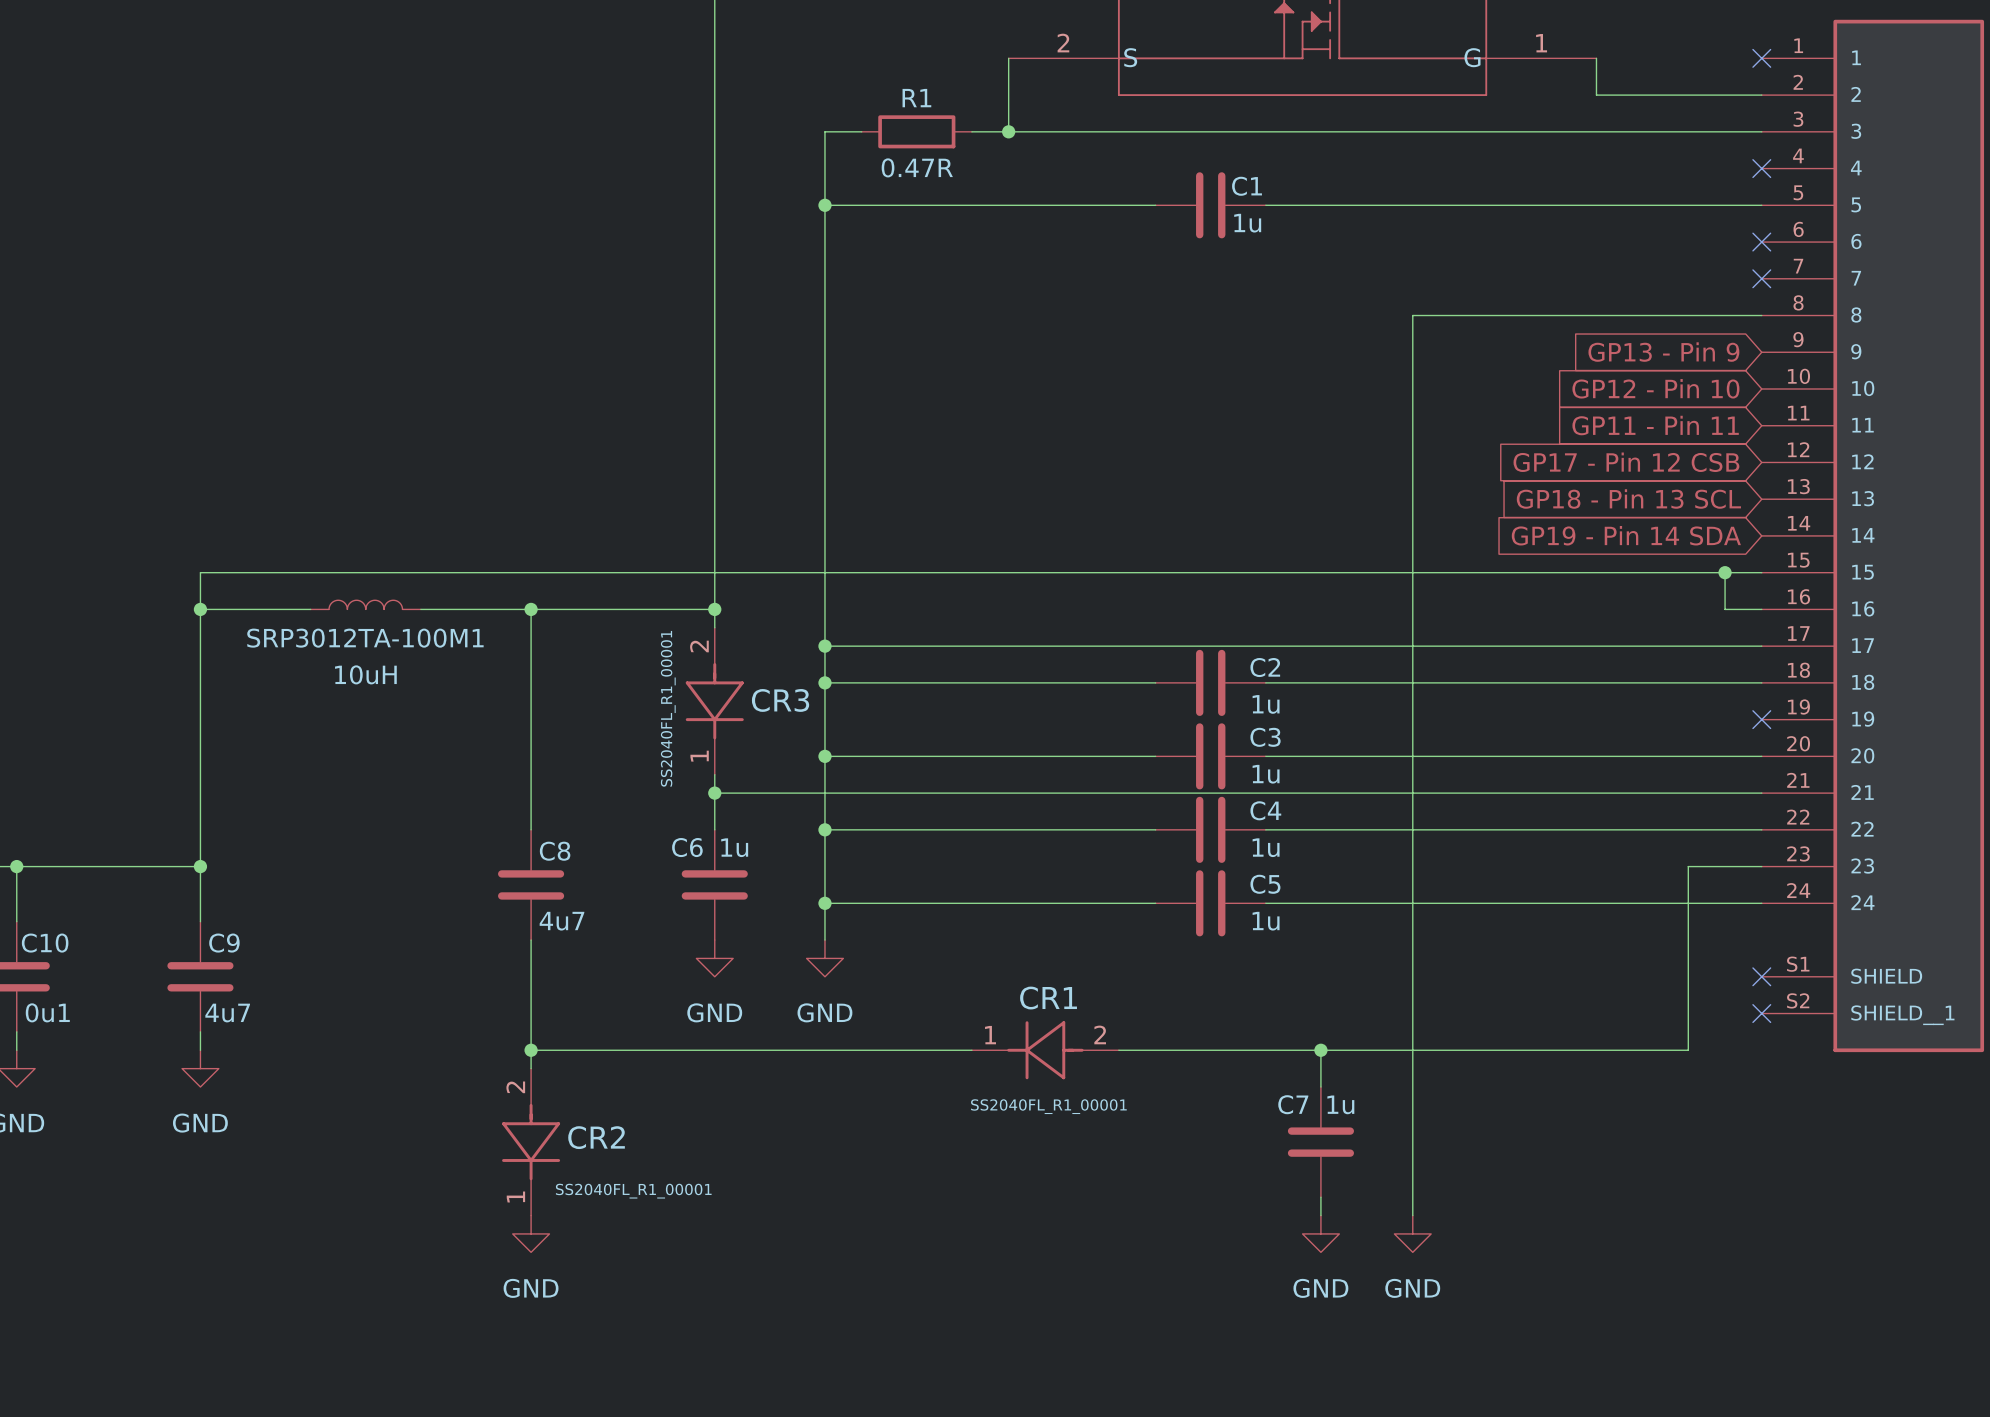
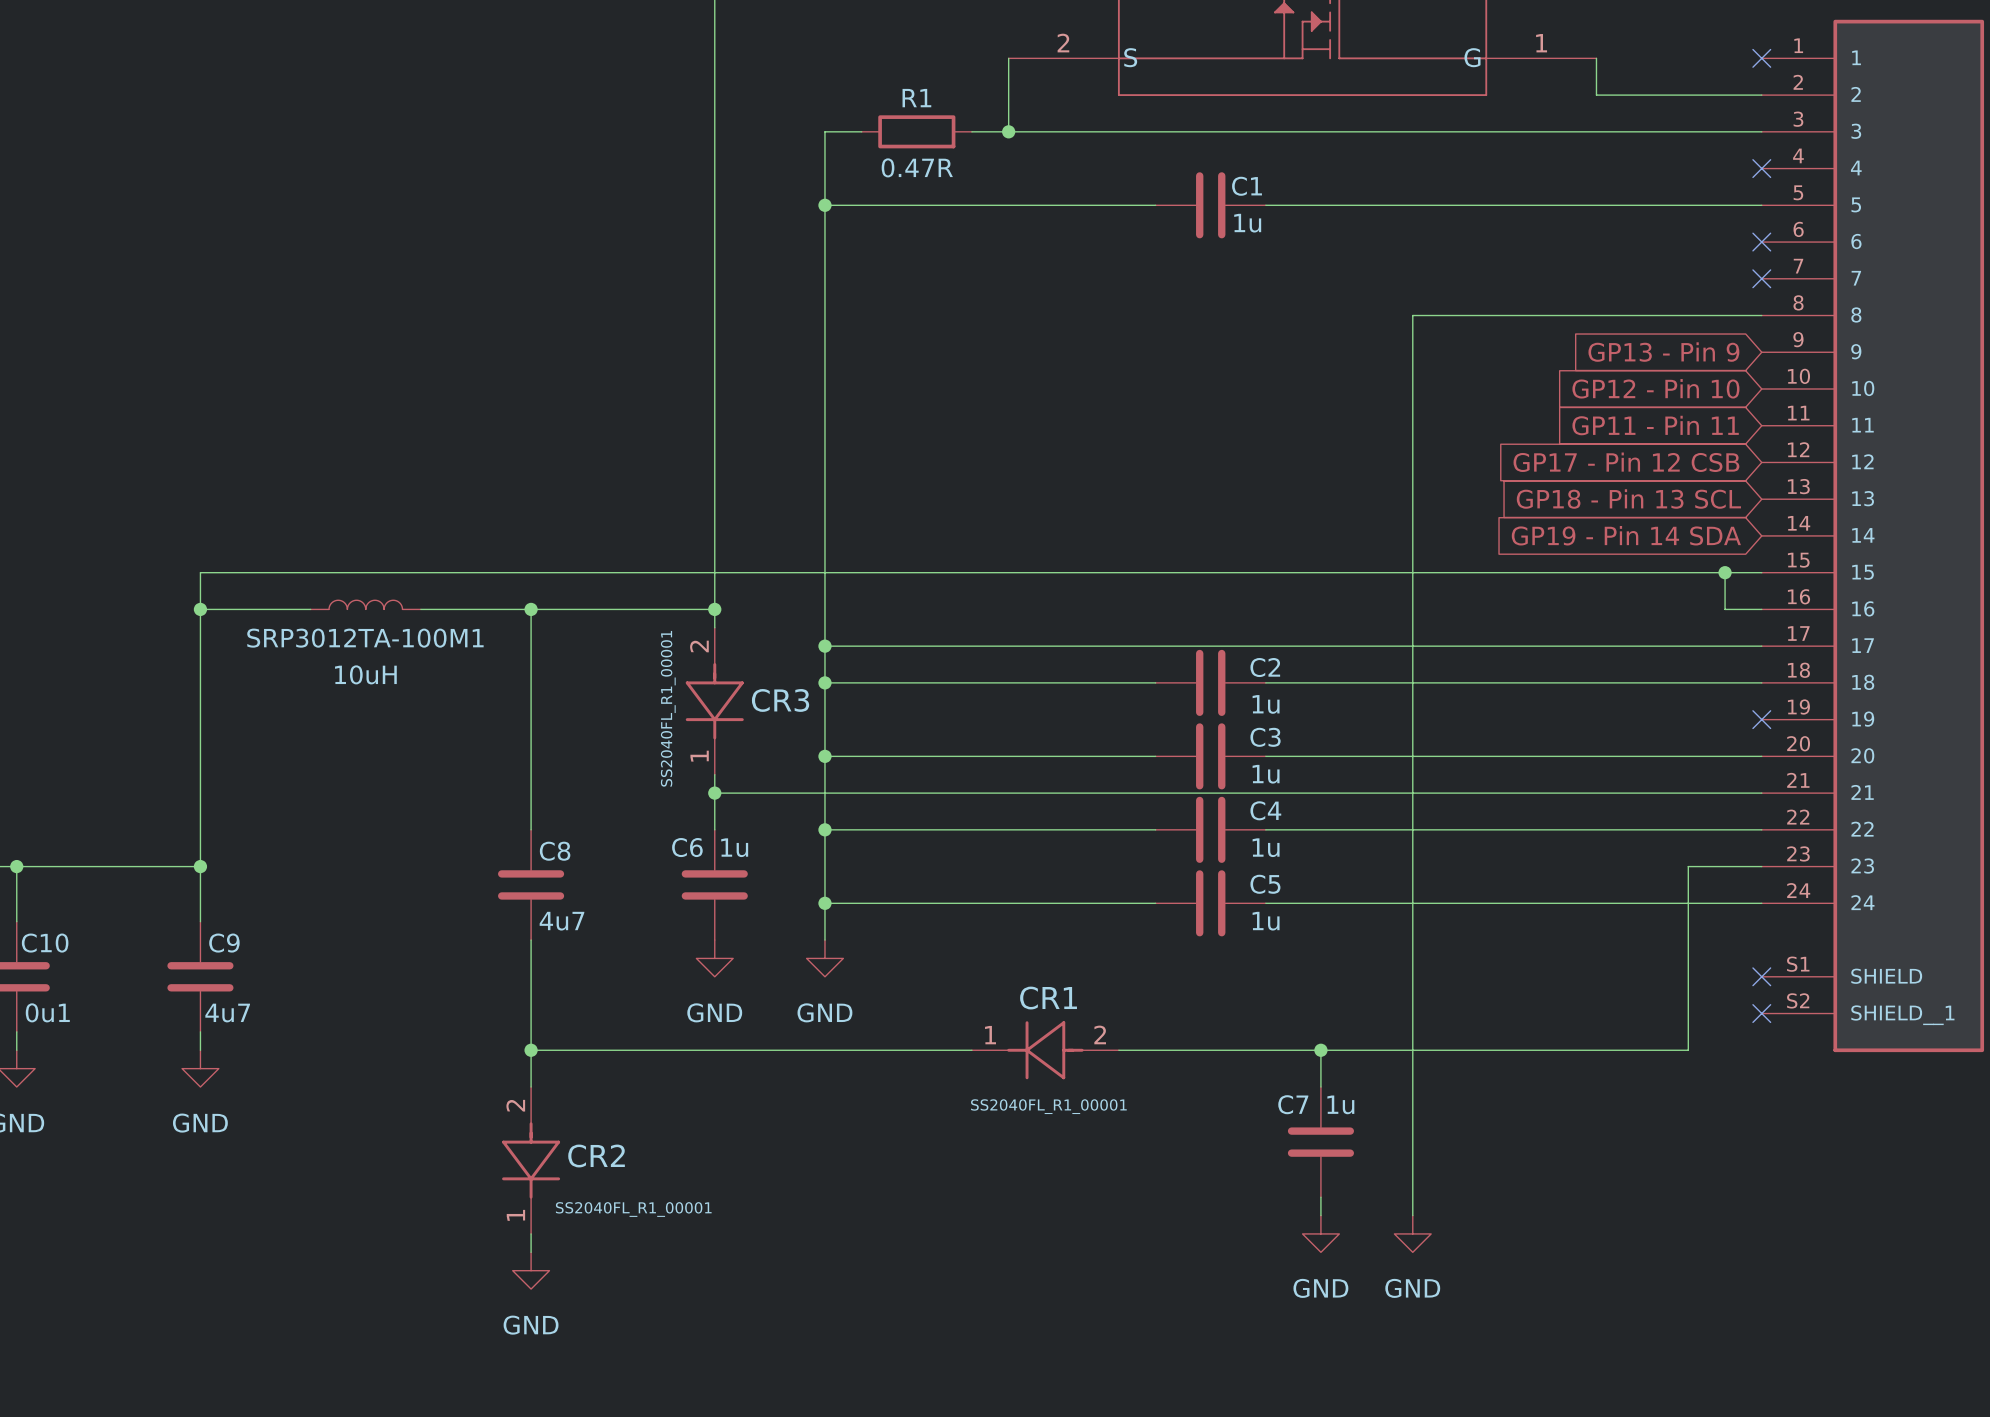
CR2 position: (531, 1142) -> (531, 1160)
wire: none -> (531, 1233) (531, 1252)
power symbol position: GND (531, 1233) -> GND (531, 1270)

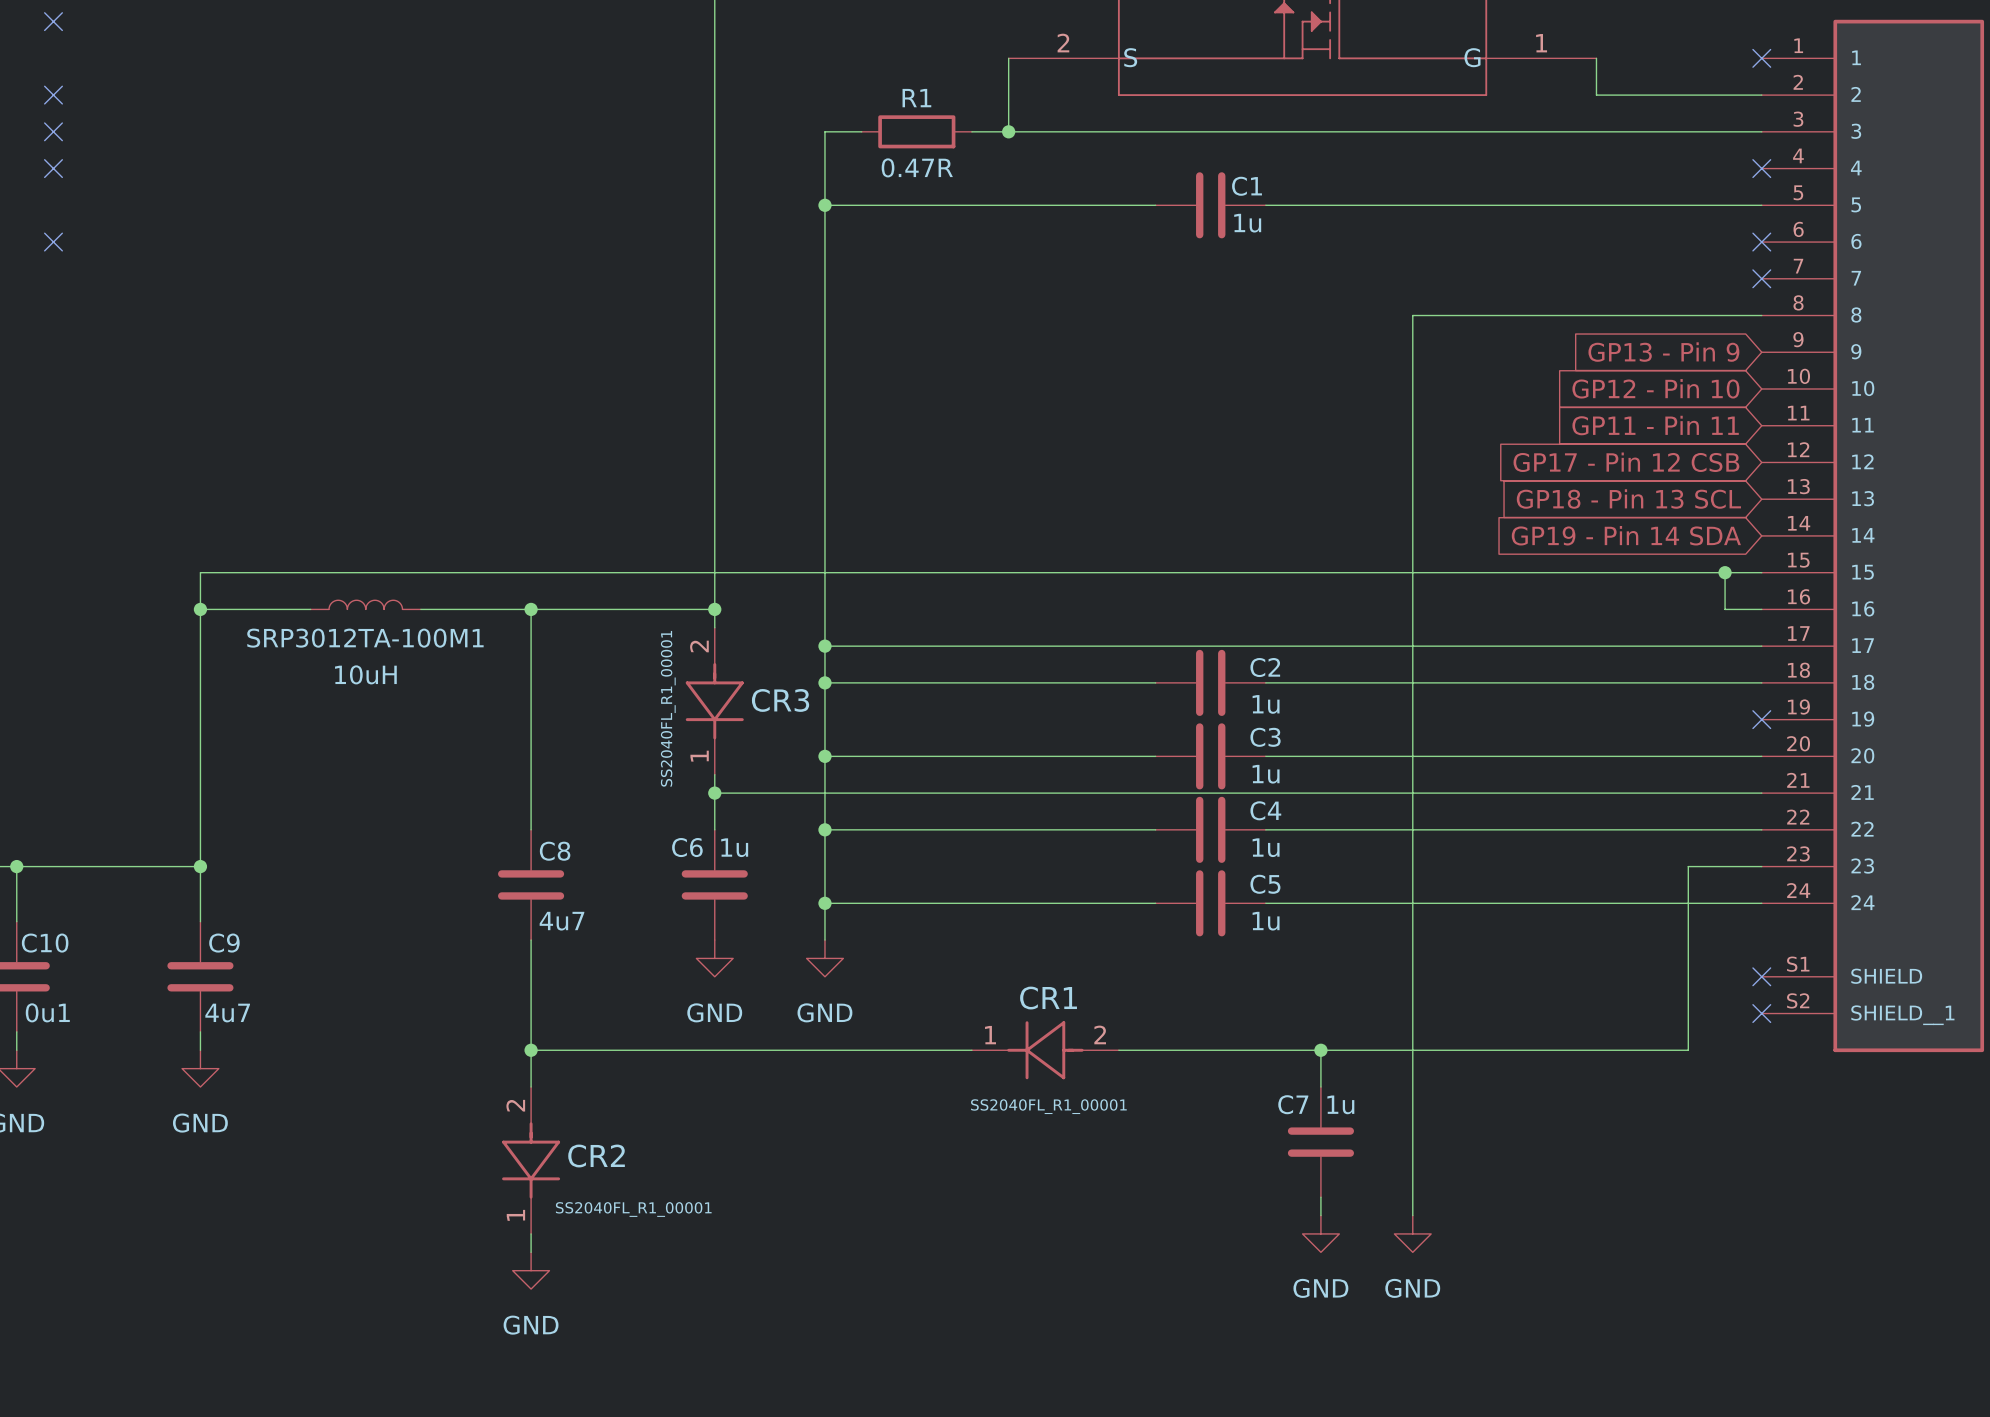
no-connect mark: none -> (53, 21)
no-connect mark: none -> (53, 95)
no-connect mark: none -> (53, 131)
no-connect mark: none -> (53, 168)
no-connect mark: none -> (53, 242)

